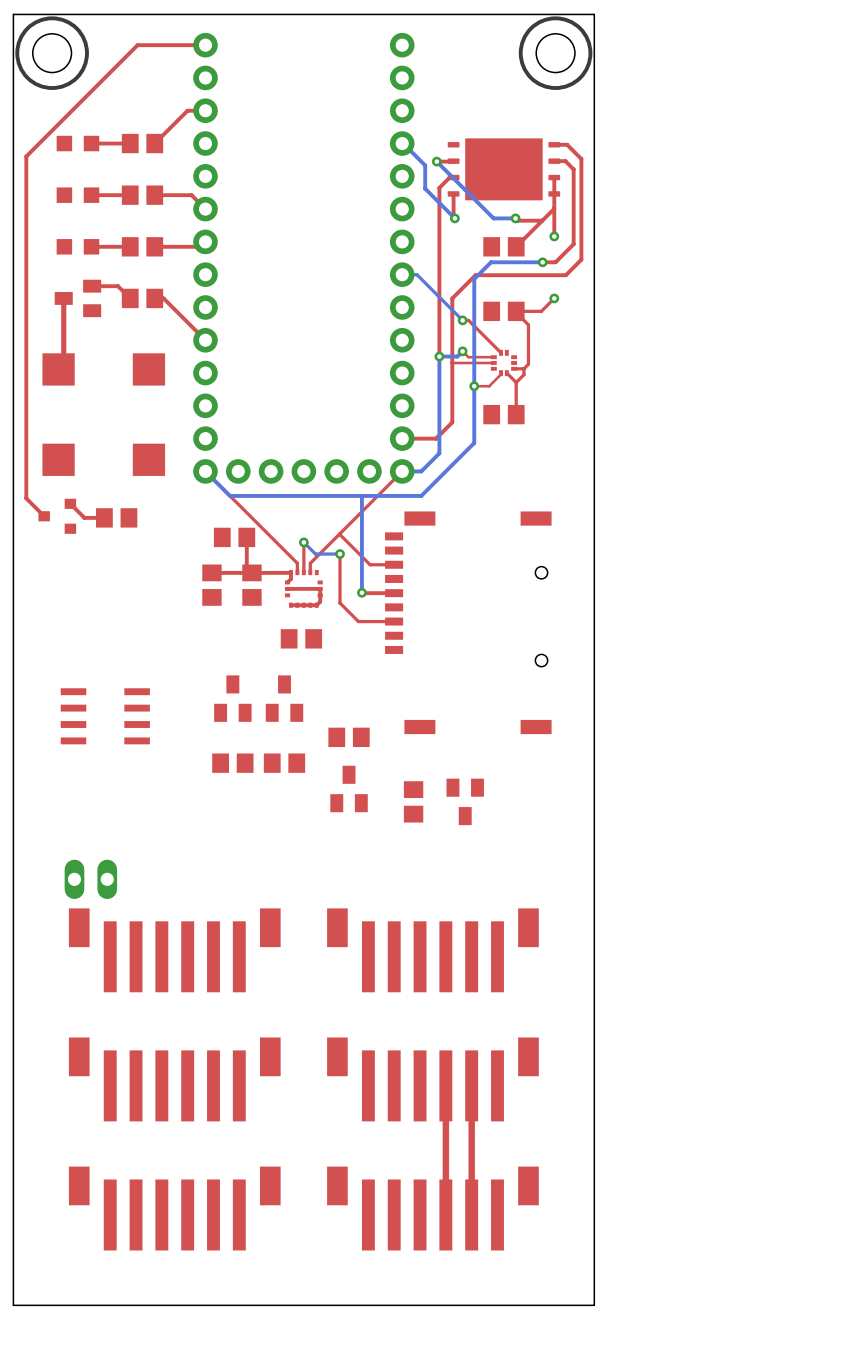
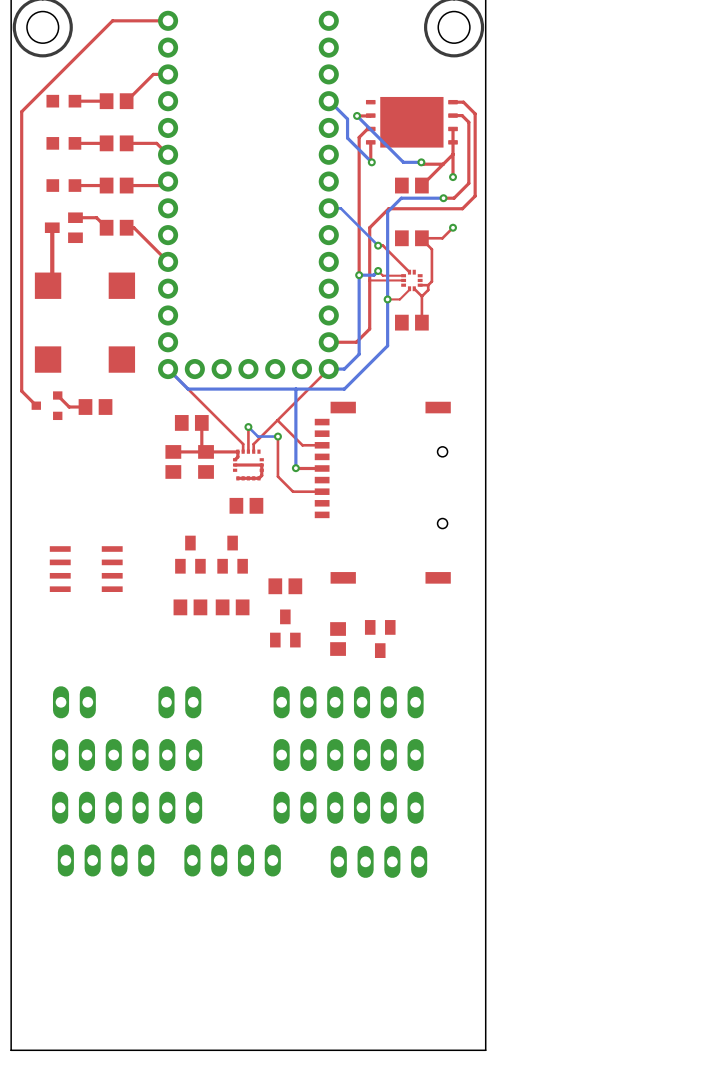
part: none -> (179, 702)
part: none -> (348, 702)
part footprint: [327, 908, 539, 993] -> [273, 738, 424, 772]
part: none -> (127, 755)
part: (174, 950) -> none
part: none -> (127, 807)
part: none -> (348, 807)
part: none -> (106, 860)
part: none -> (232, 860)
part: none -> (378, 861)
part: (174, 1079) -> none
part: (432, 1079) -> none
top track: (445, 1085) (445, 1214) -> none
top track: (471, 1085) (471, 1214) -> none
part: (174, 1208) -> none
part: (432, 1208) -> none

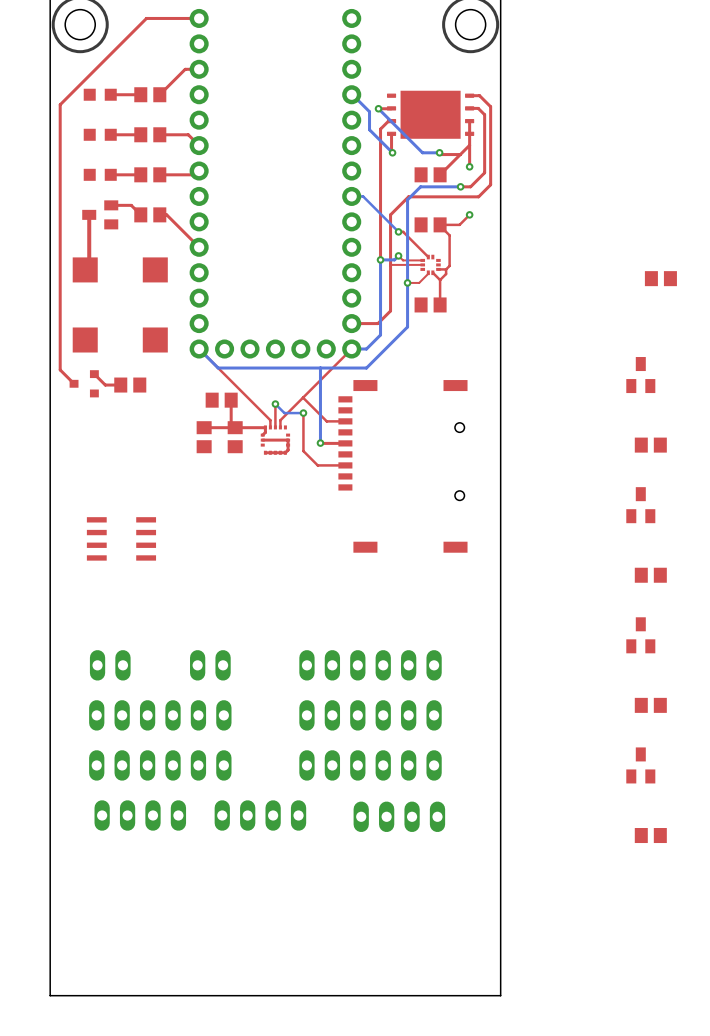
part: none -> (660, 278)
part: none -> (640, 375)
part: none -> (650, 445)
part: (246, 505) -> none
part: none -> (640, 505)
part: (190, 554) -> none
part: (232, 554) -> none
part: (285, 586) -> none
part: (190, 607) -> none
part: (232, 607) -> none
part: none -> (650, 575)
part: (285, 628) -> none
part: (338, 639) -> none
part: (380, 639) -> none
part: none -> (640, 635)
part: none -> (650, 705)
part: none -> (640, 765)
part: none -> (650, 835)

